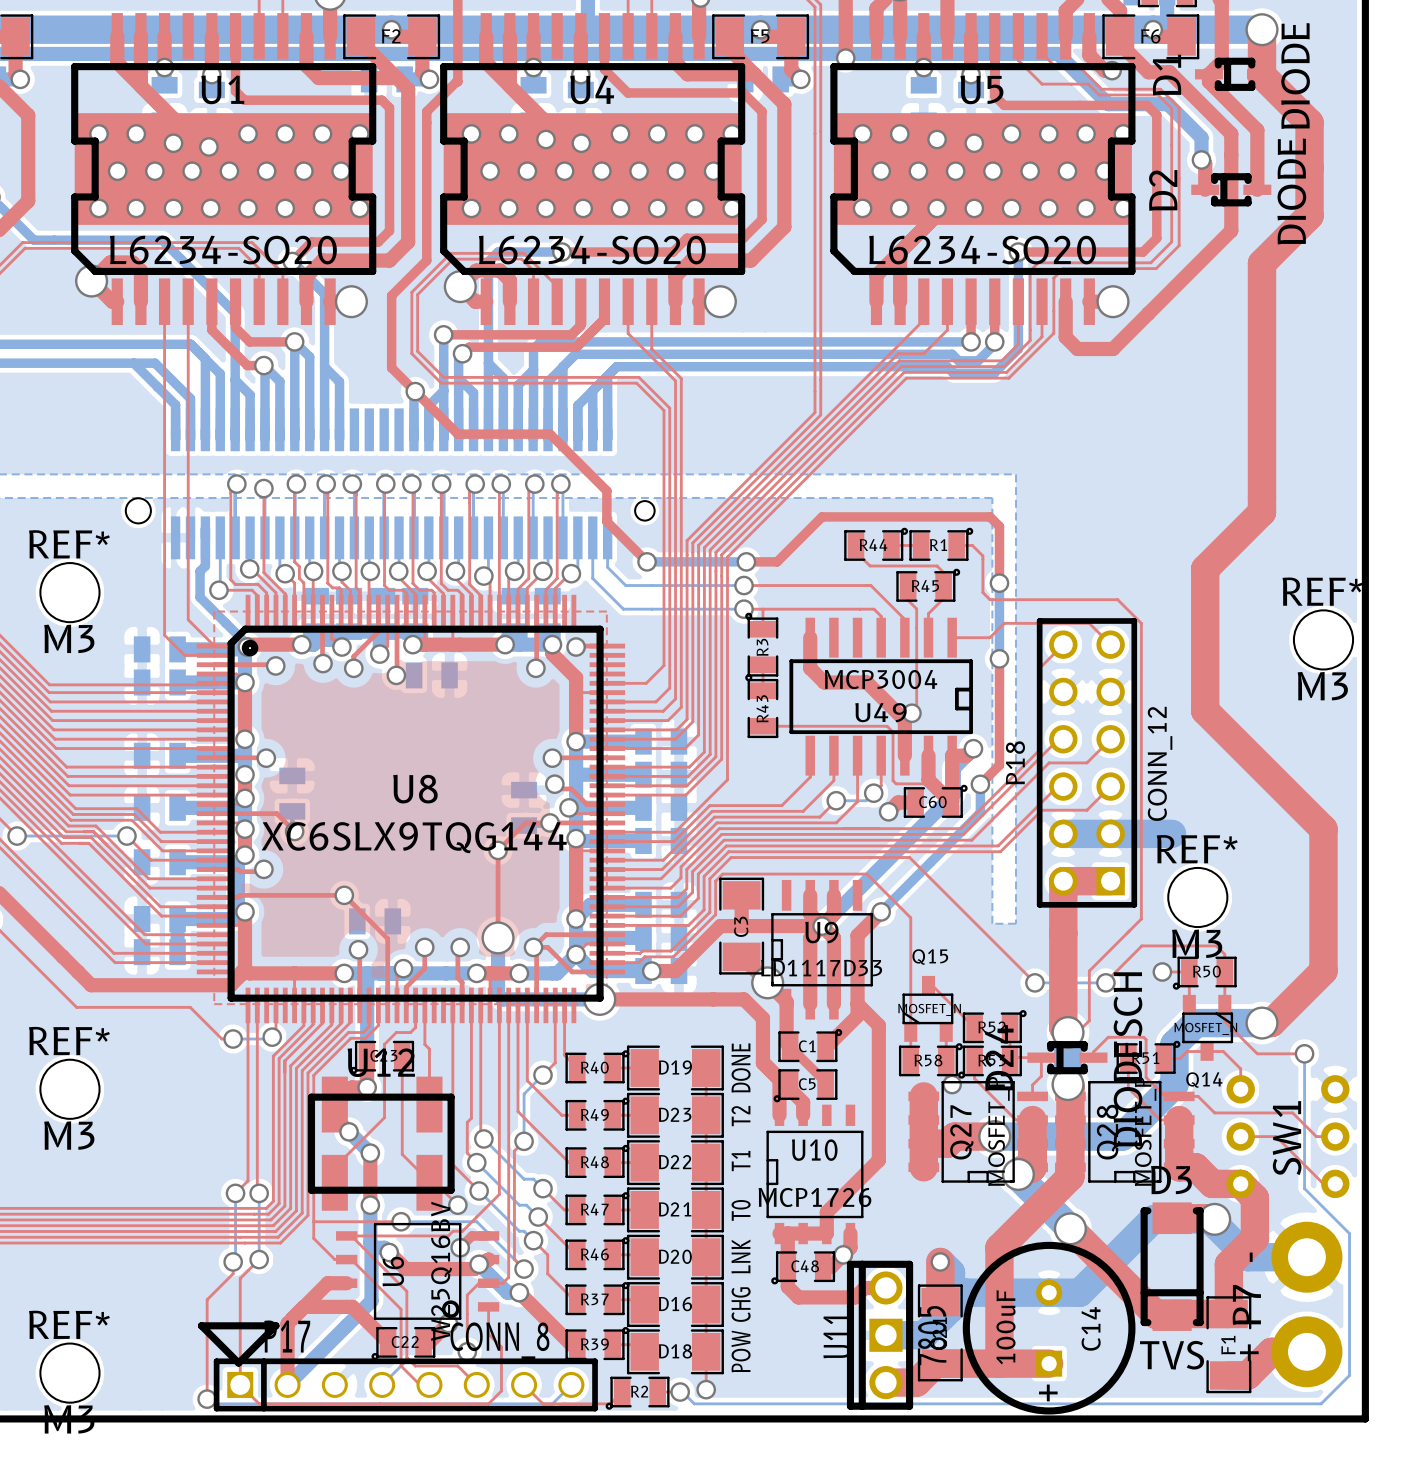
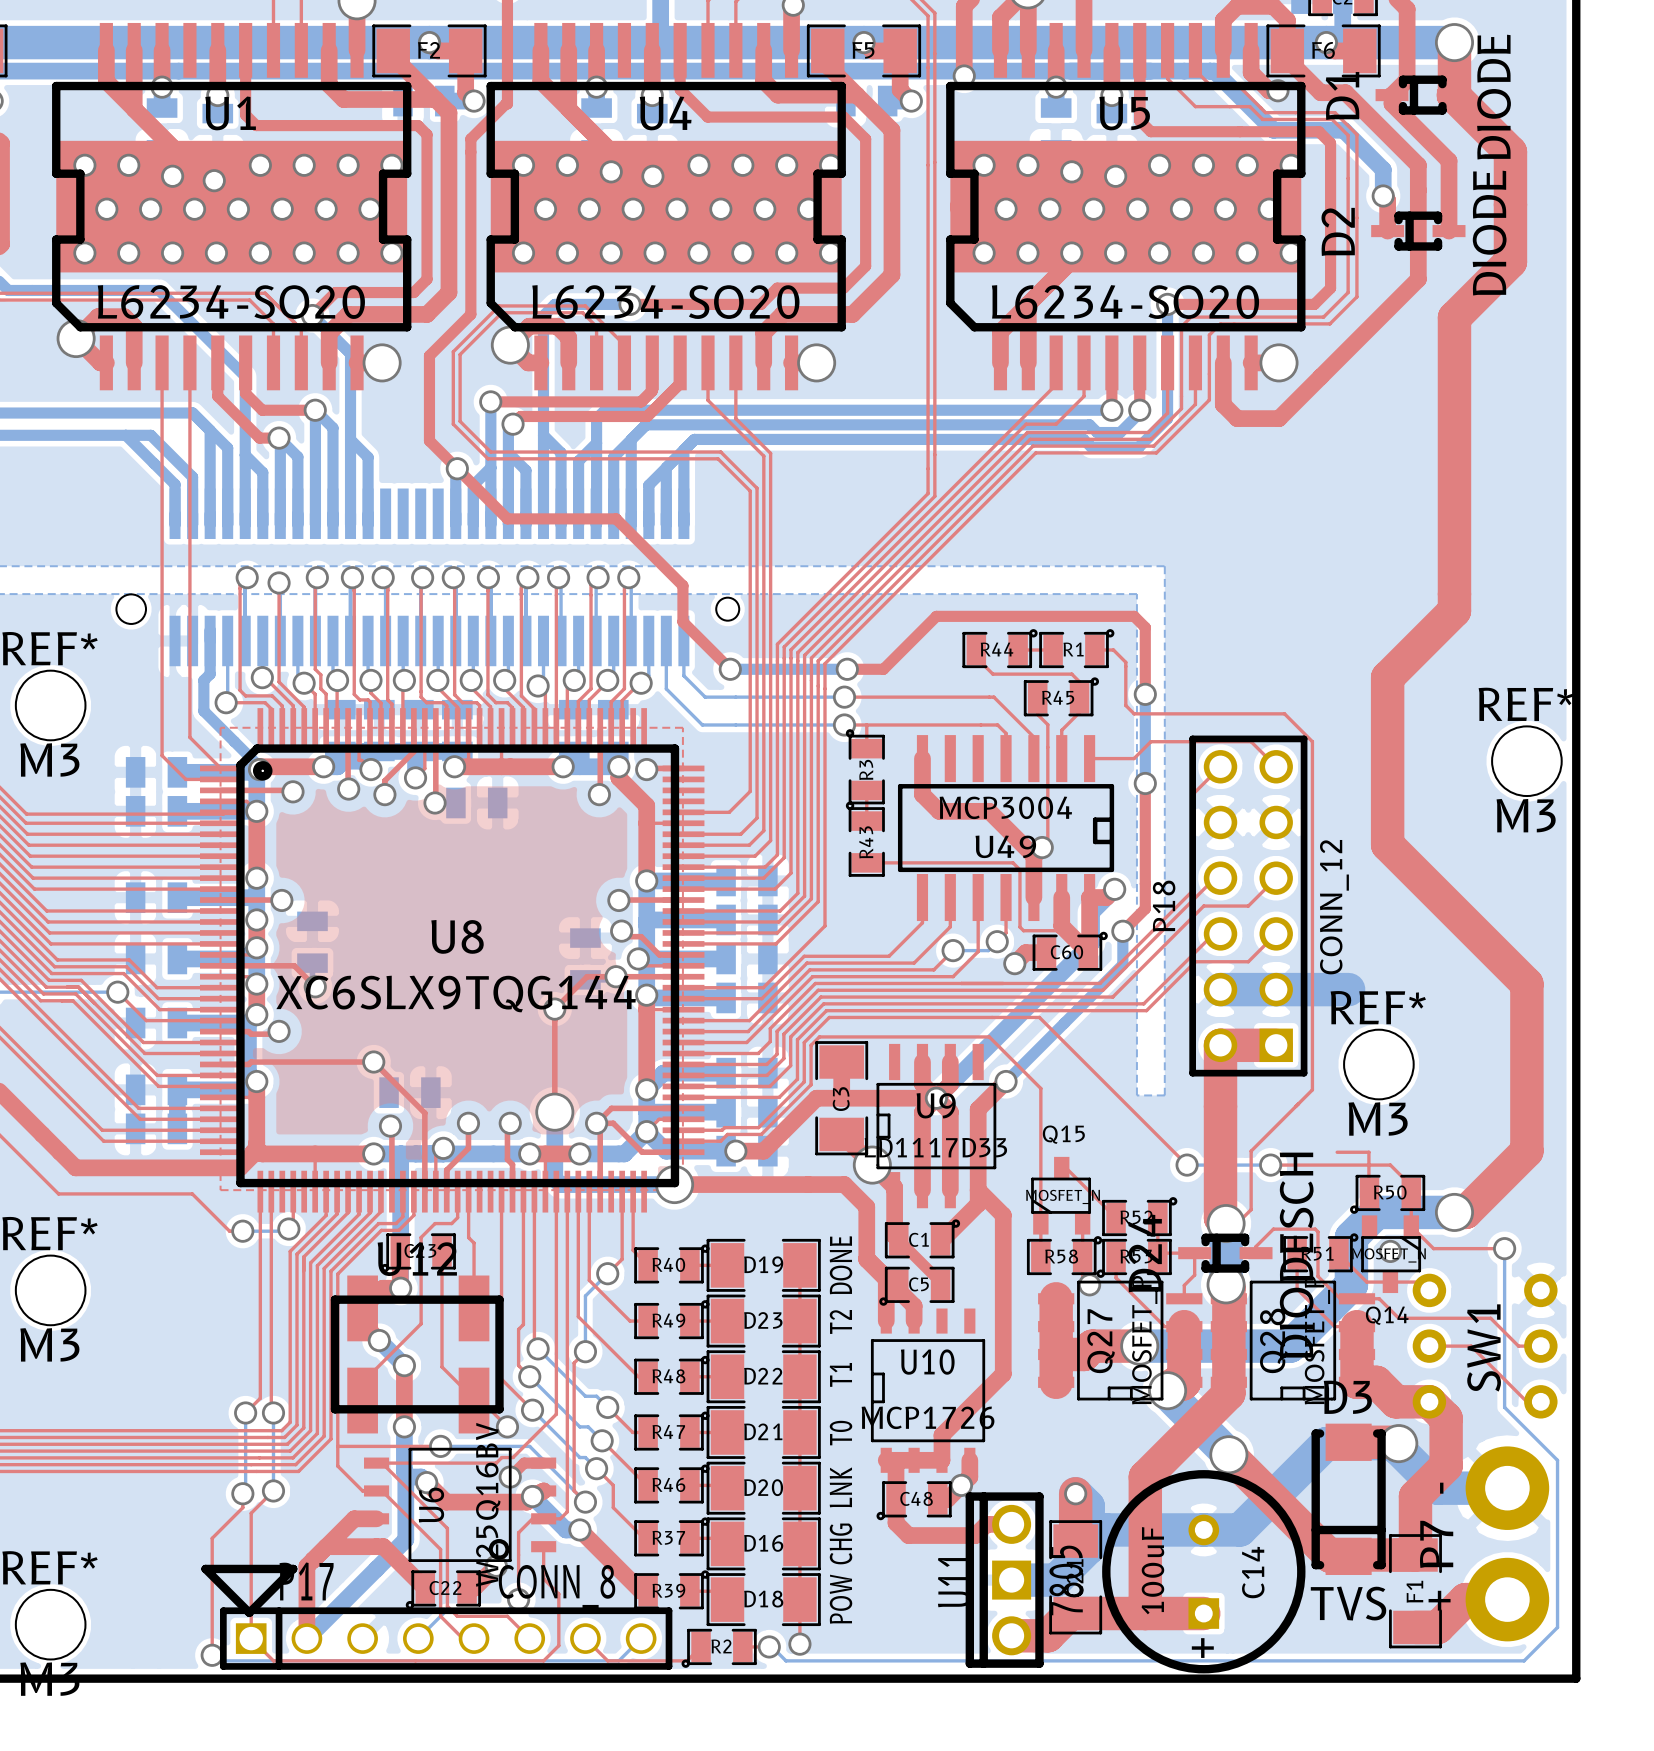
via position: (1162, 971) -> (1390, 1251)
R50 position: (1204, 973) -> (1387, 1194)
top track: (1105, 982) (1141, 945) (1216, 945) (1224, 954) (1224, 1021) (1257, 1053) -> (1270, 1165) (1390, 1165) (1411, 1185) (1411, 1226) (1433, 1248) (1448, 1248)
Q14 position: (1207, 1027) -> (1391, 1254)
top track: (1163, 1058) (1180, 1058) (1187, 1051) (1223, 1051) (1240, 1068) (1240, 1089) -> (1338, 1254) (1366, 1282) (1421, 1282) (1429, 1290)

